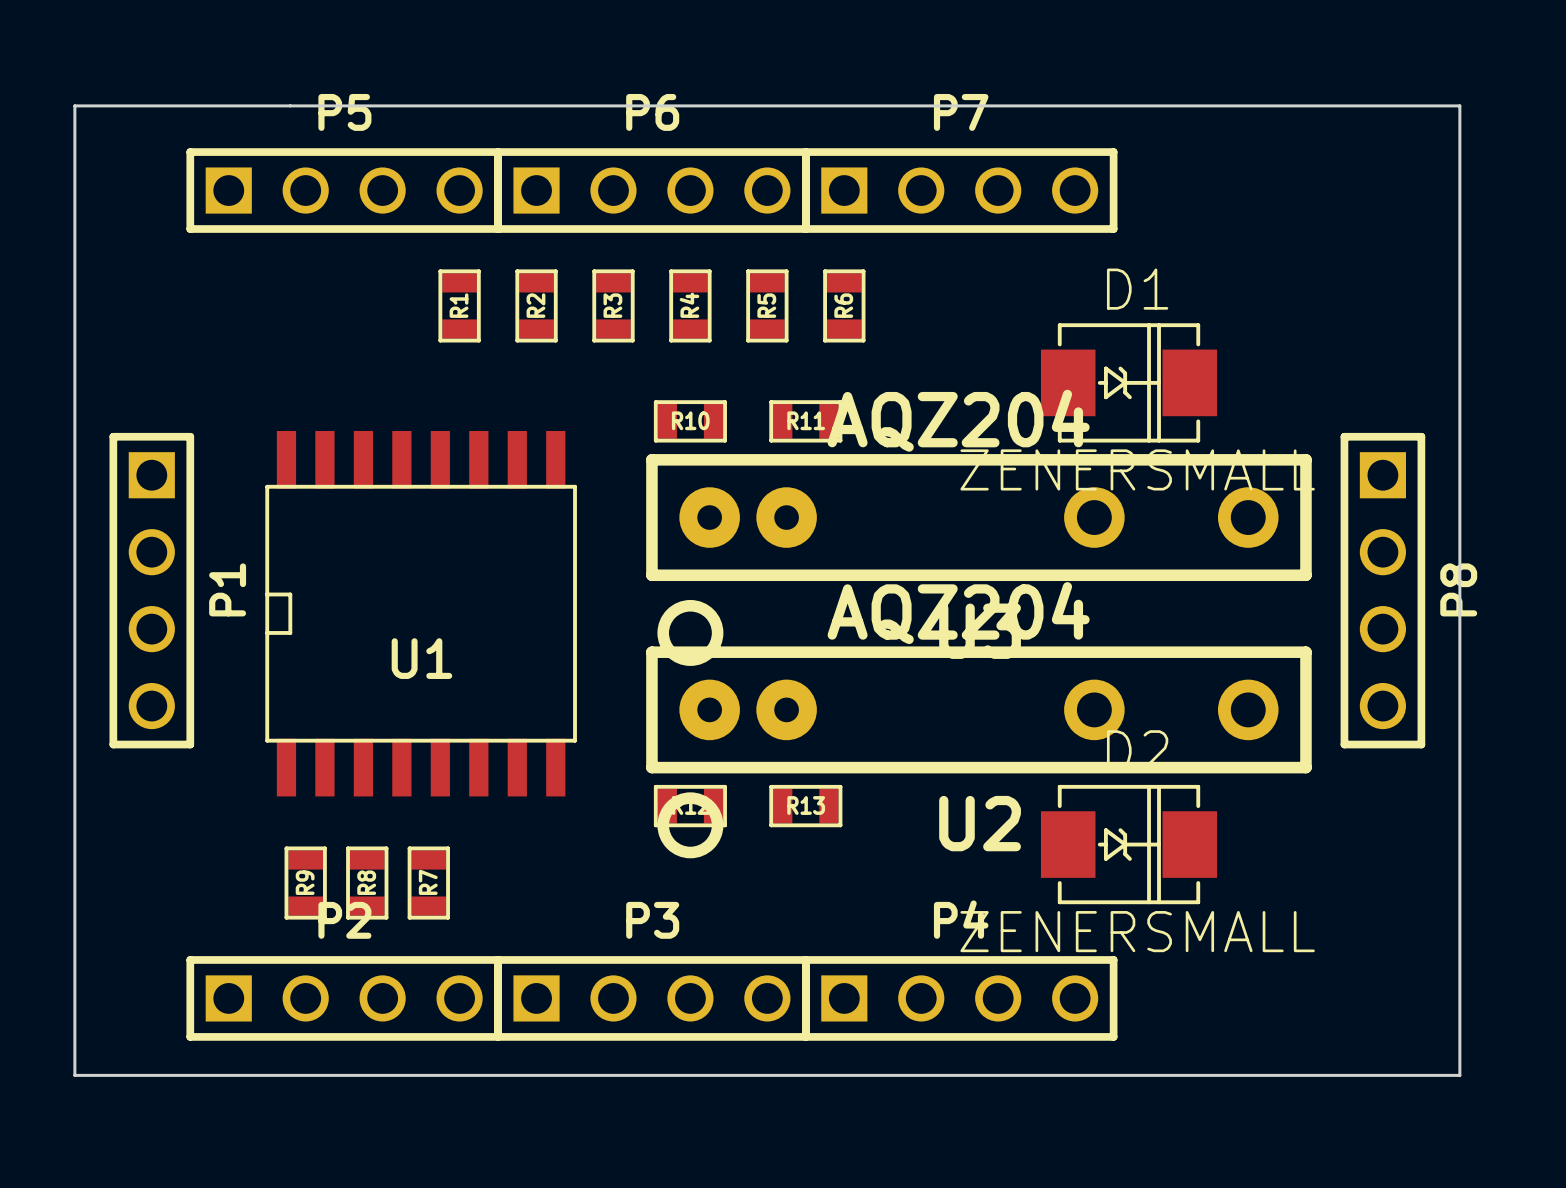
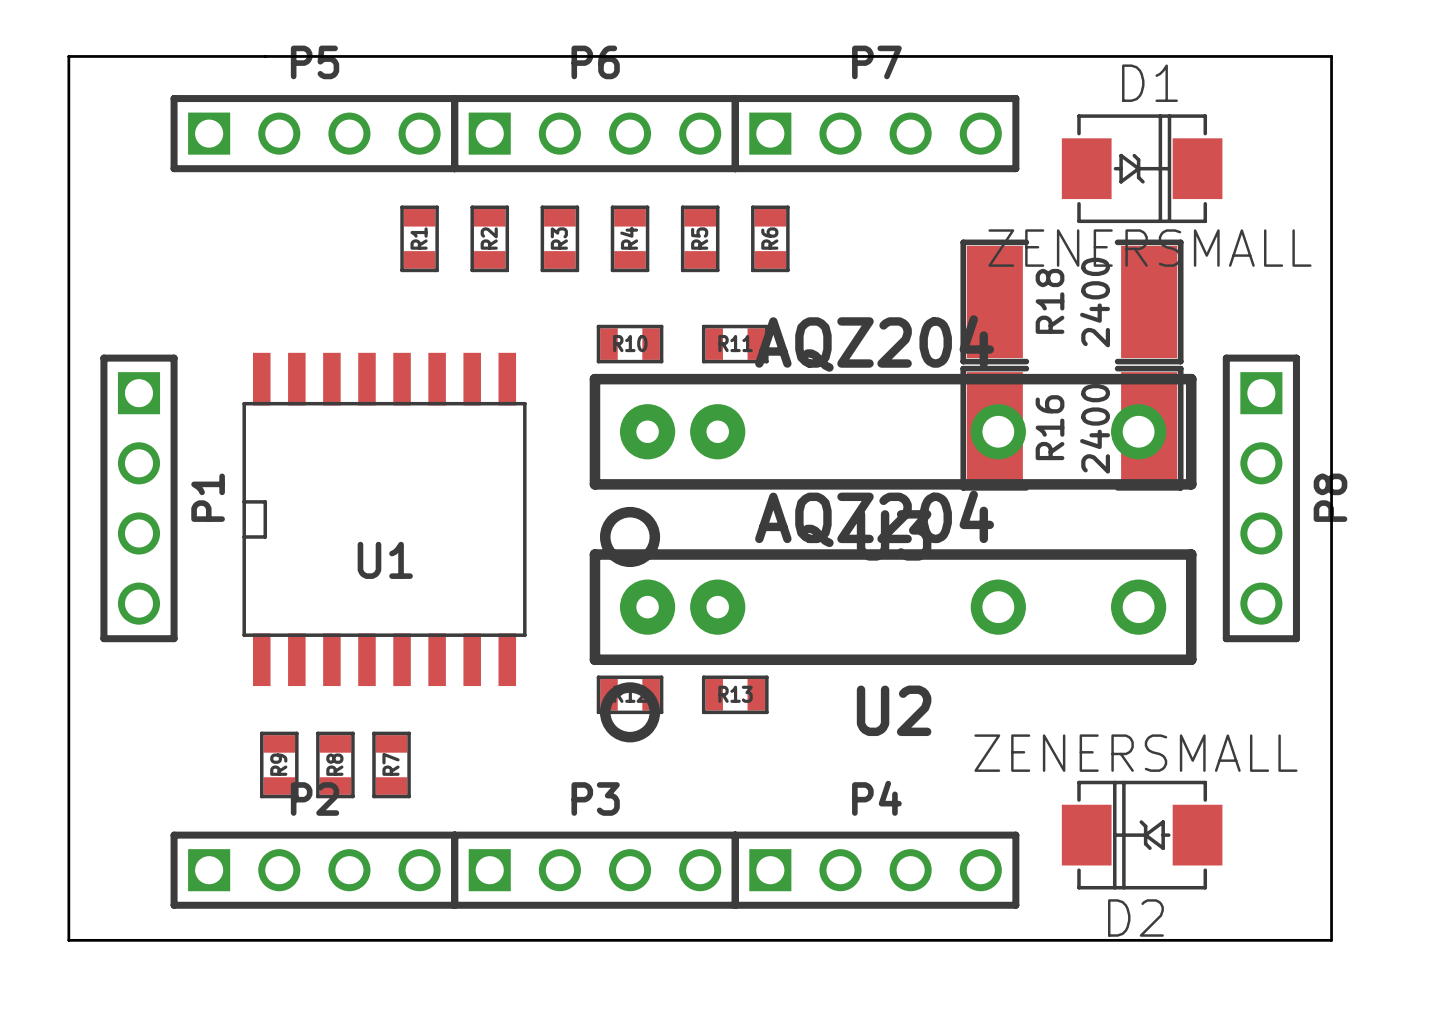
R18: none -> 2400 (1071, 301)
D1 position: (1129, 382) -> (1142, 168)
R16: none -> 2400 (1071, 428)
D2 rotation: 0° (1129, 844) -> 180° (1142, 835)
D2 position: (1129, 844) -> (1142, 835)

